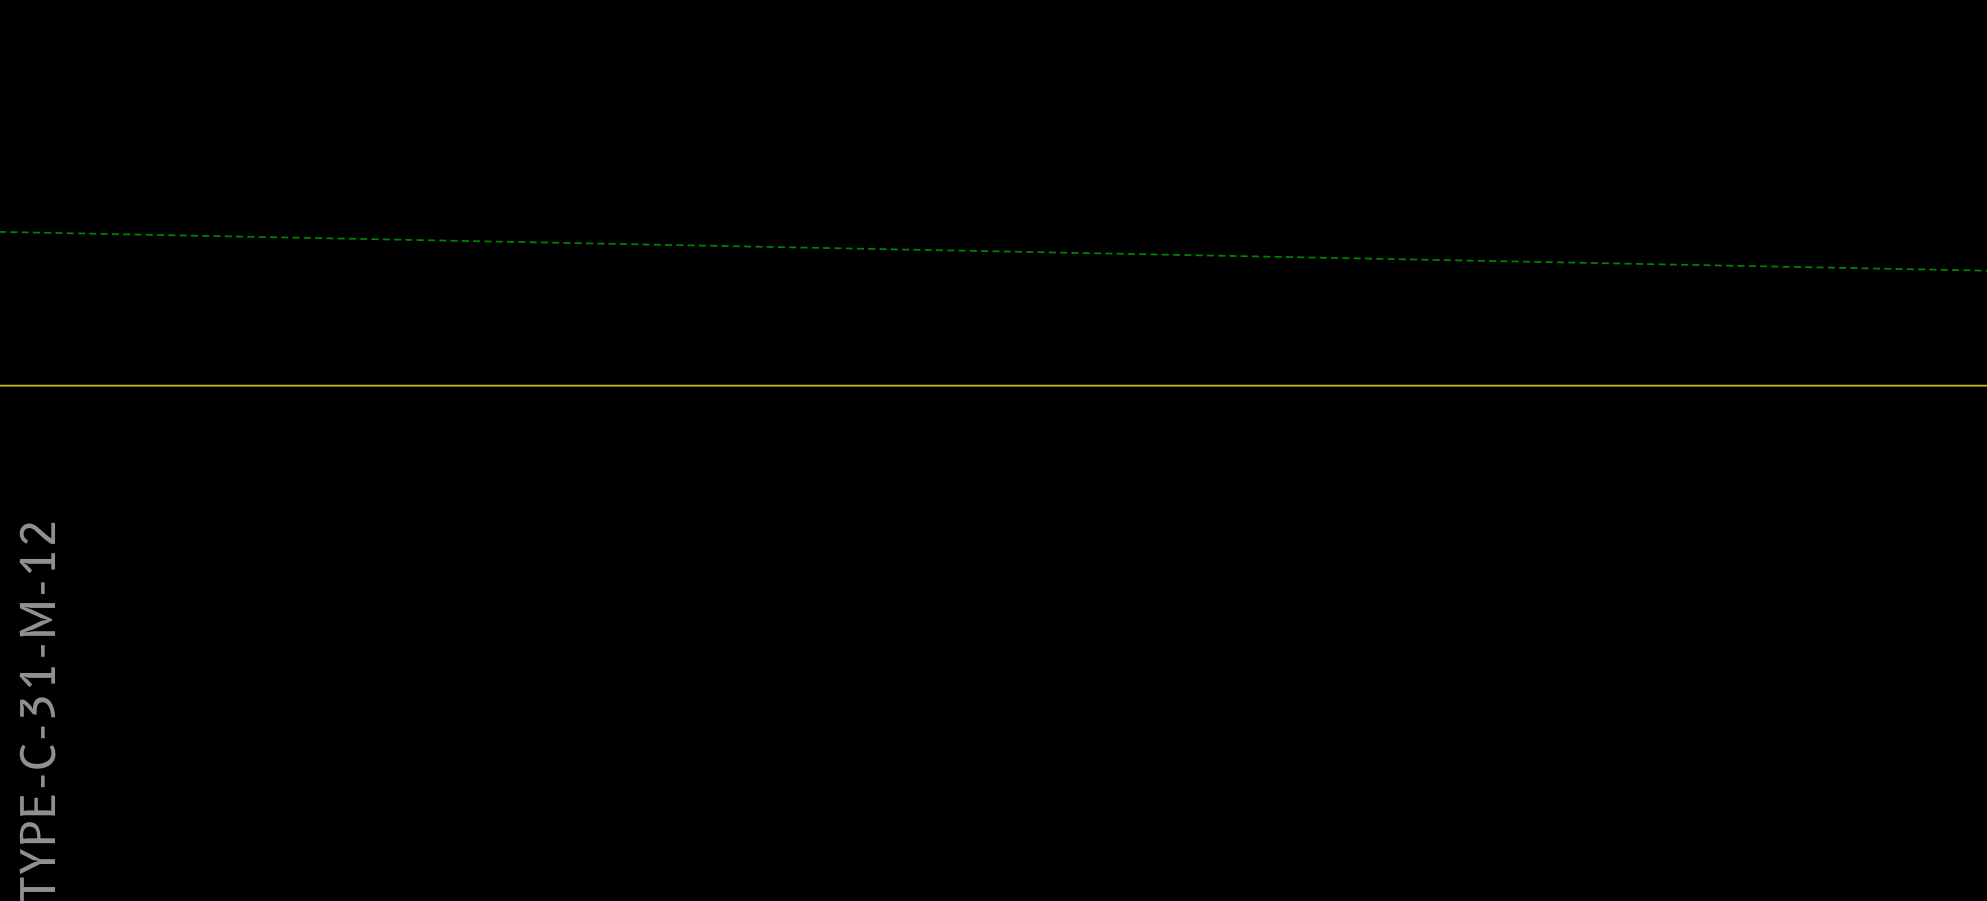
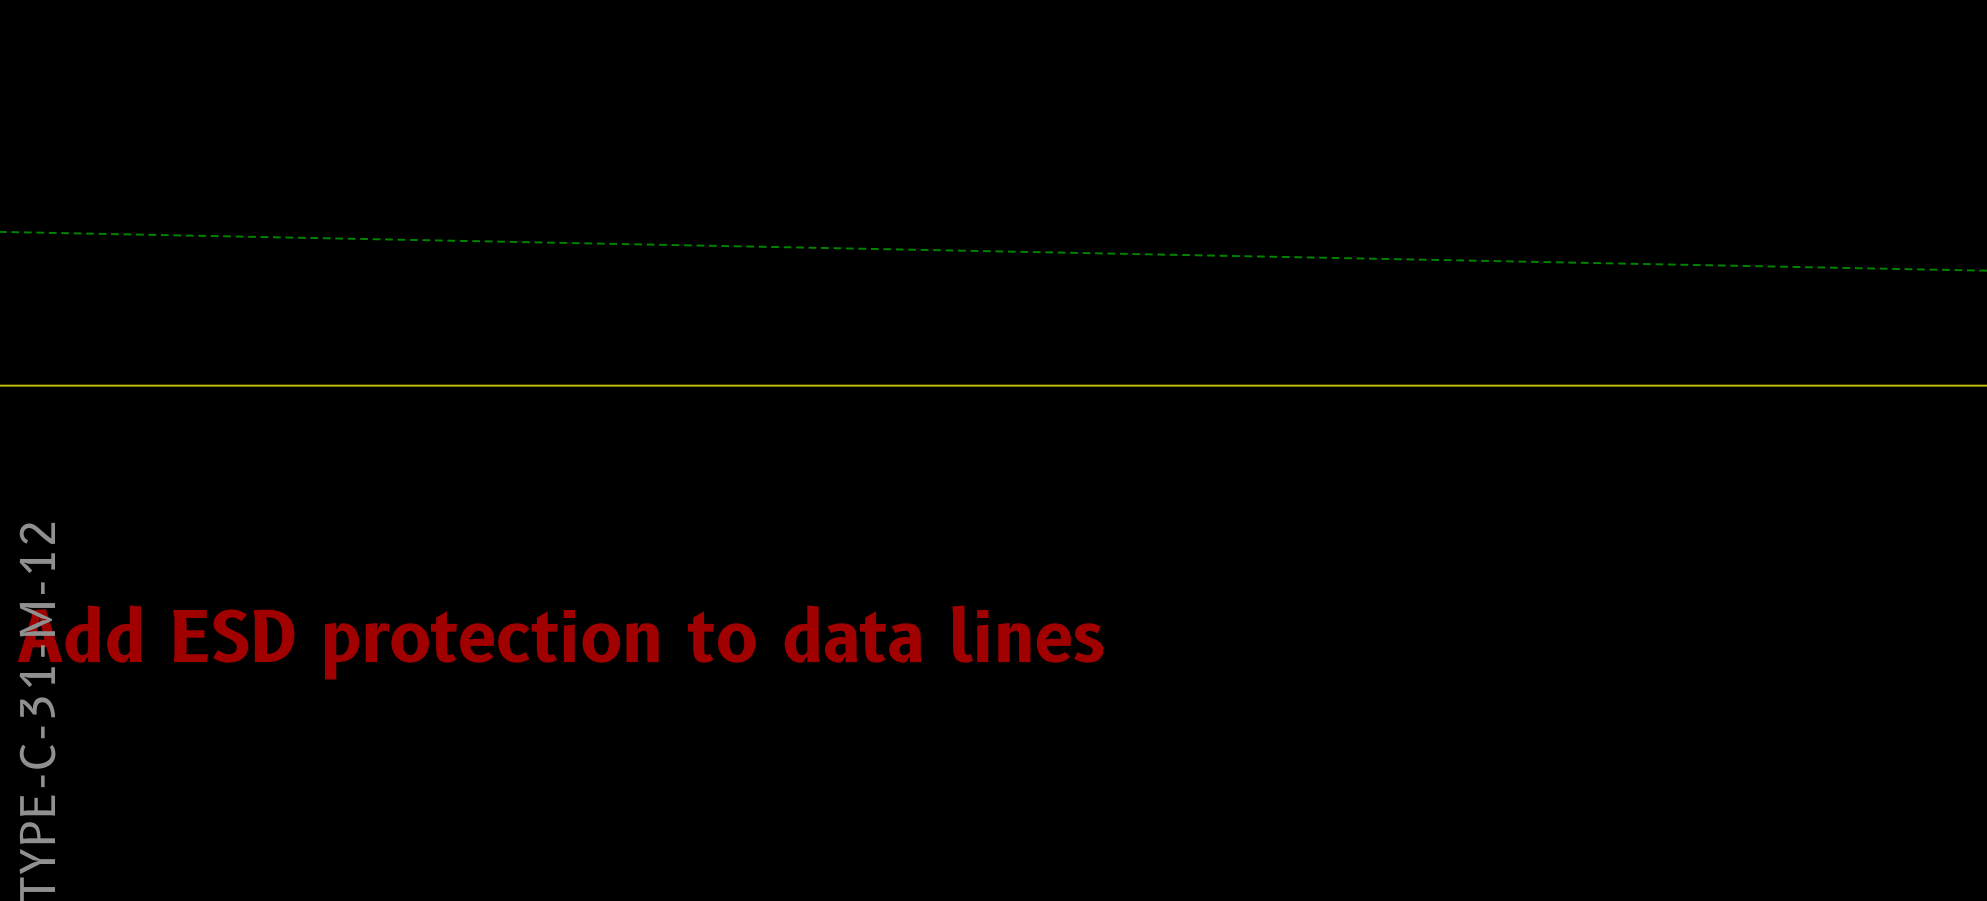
text: none -> Add ESD protection to data lines (560, 642)

